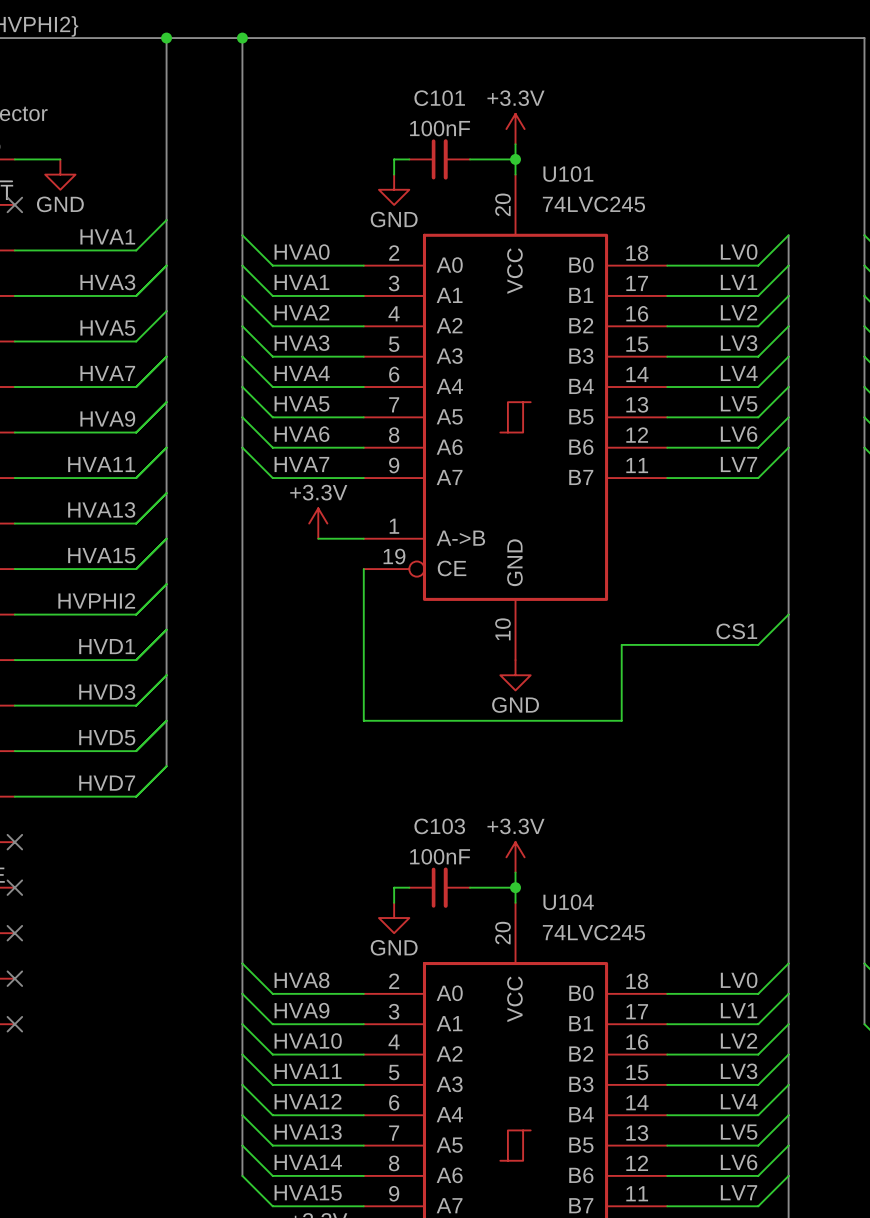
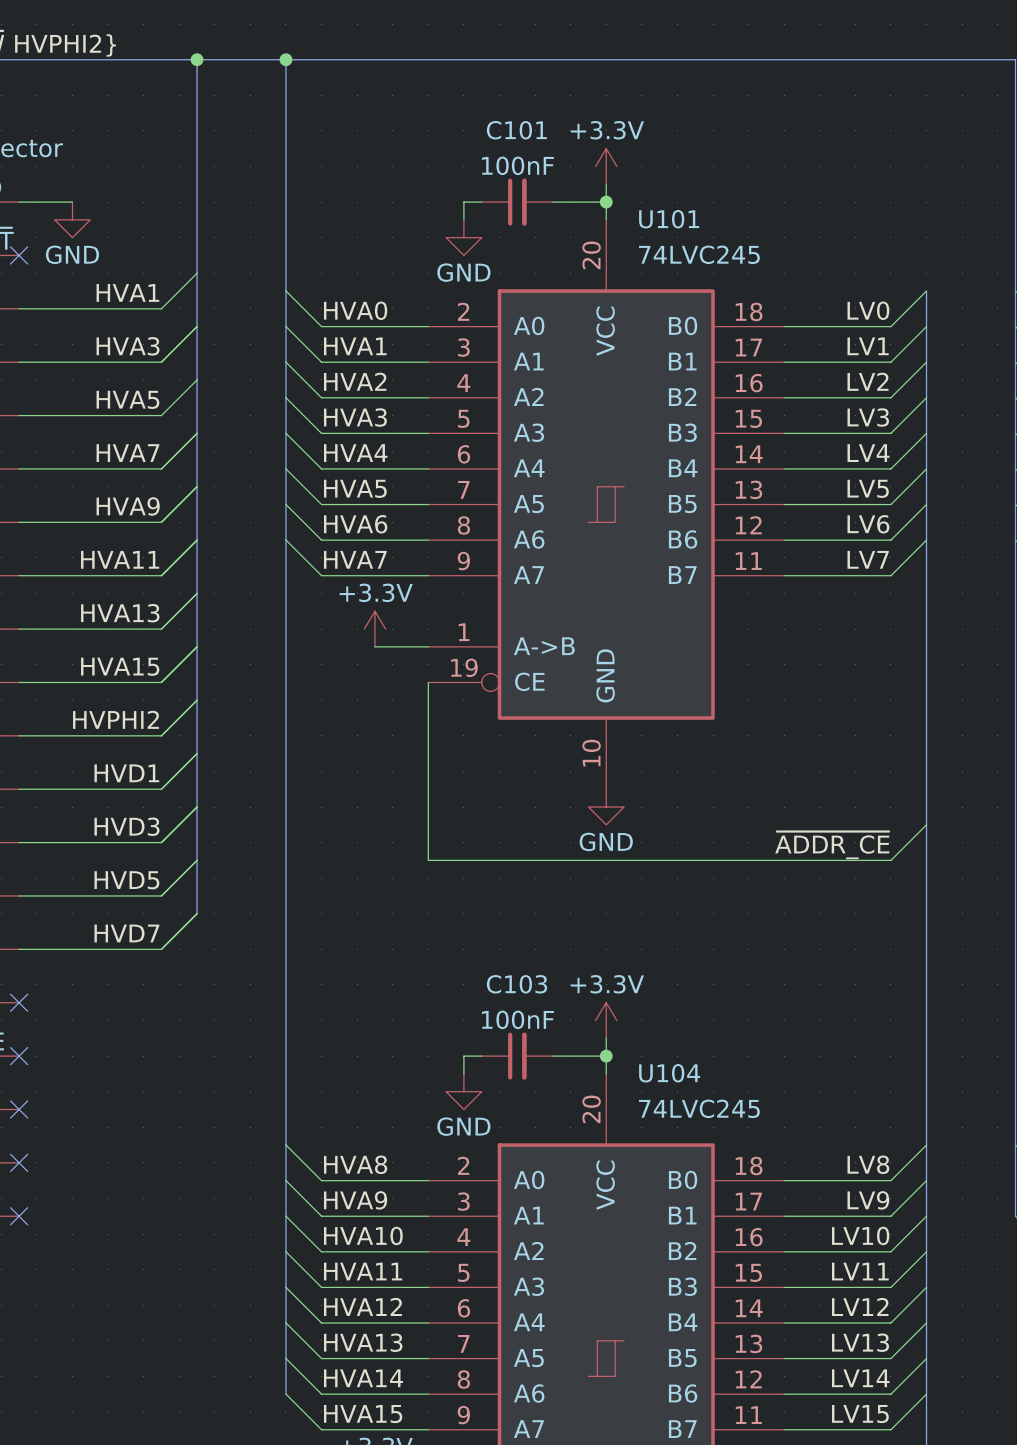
wire: (788, 614) (758, 644) (621, 644) (621, 720) -> (926, 824) (890, 860) (730, 860)
label: CS1 (736, 631) -> none
label: none -> ~{ADDR_CE} (832, 845)
label: LV0 (739, 980) -> LV8 (868, 1164)
label: LV1 (739, 1010) -> LV9 (868, 1200)
label: LV2 (739, 1040) -> LV10 (860, 1235)
label: LV3 (739, 1071) -> LV11 (860, 1271)
label: LV4 (739, 1101) -> LV12 (860, 1306)
label: LV5 (739, 1132) -> LV13 (860, 1342)
label: LV6 (739, 1162) -> LV14 (860, 1378)
label: LV7 (739, 1192) -> LV15 (860, 1414)

